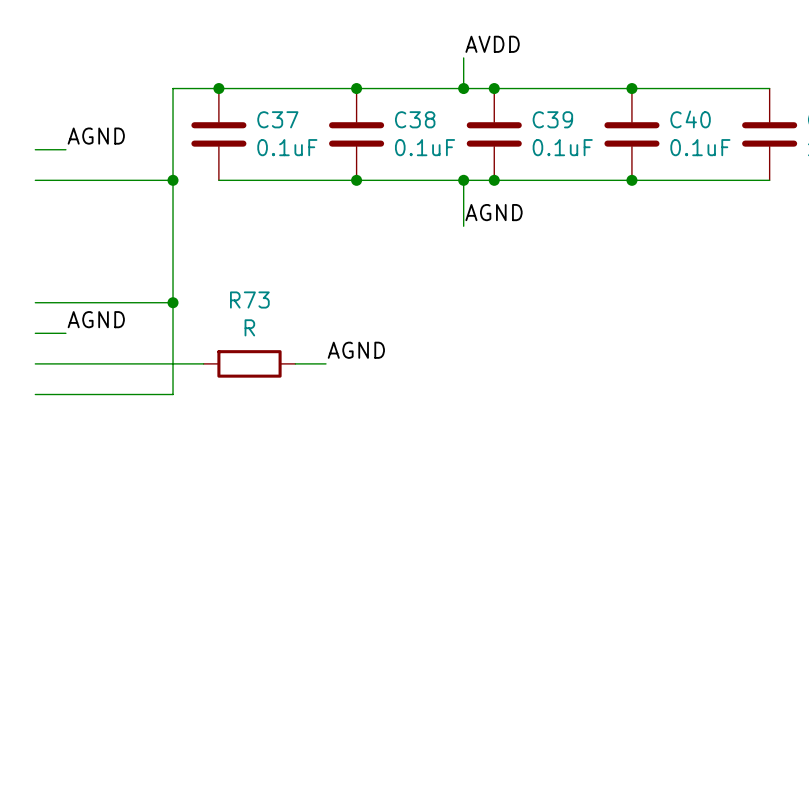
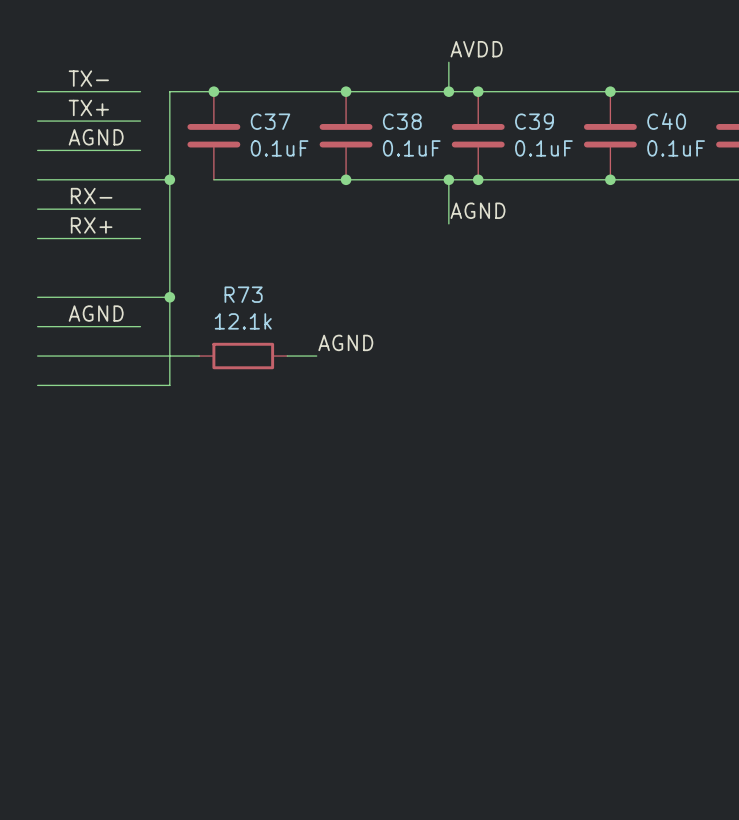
label: none -> TX- (88, 78)
wire: none -> (37, 91) (140, 91)
label: none -> TX+ (88, 107)
wire: none -> (37, 121) (140, 121)
wire: none -> (67, 150) (140, 150)
label: none -> RX- (91, 196)
wire: none -> (37, 209) (140, 209)
label: none -> RX+ (91, 225)
wire: none -> (37, 238) (140, 238)
R73 value: R (249, 327) -> 12.1k (243, 321)
wire: none -> (67, 326) (140, 326)

